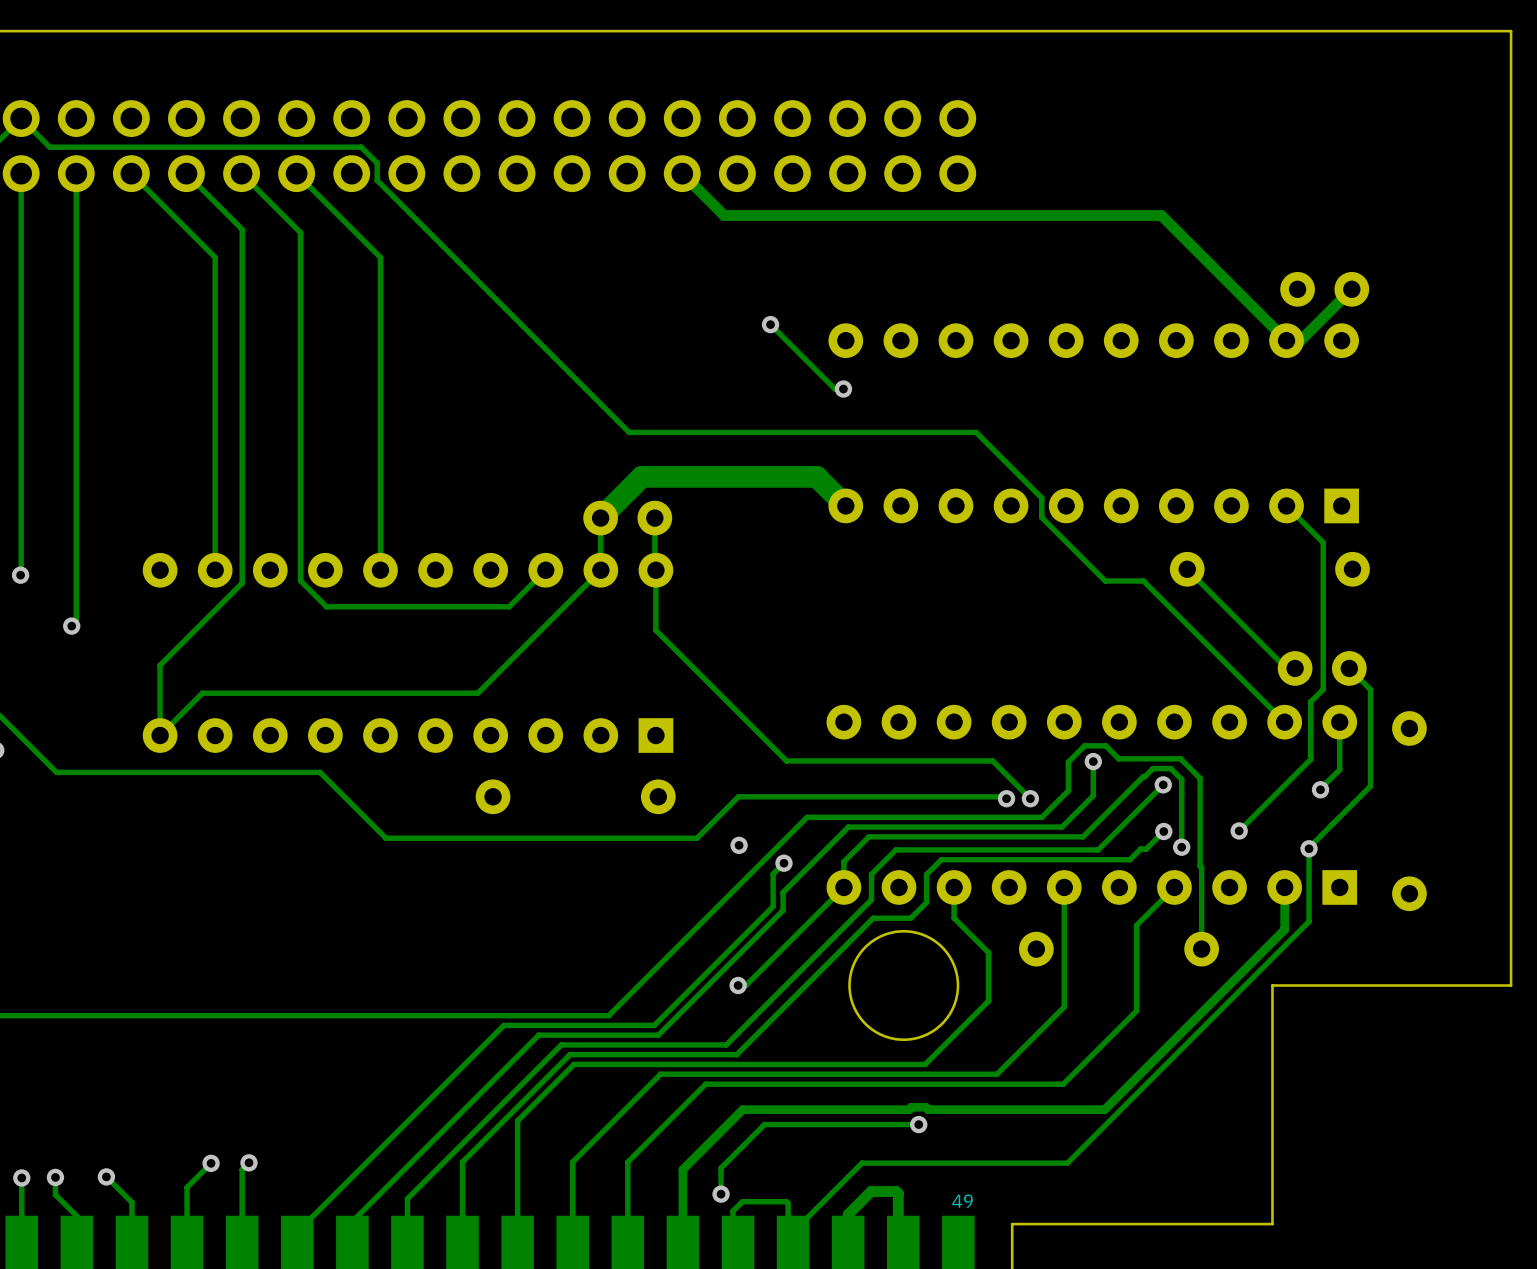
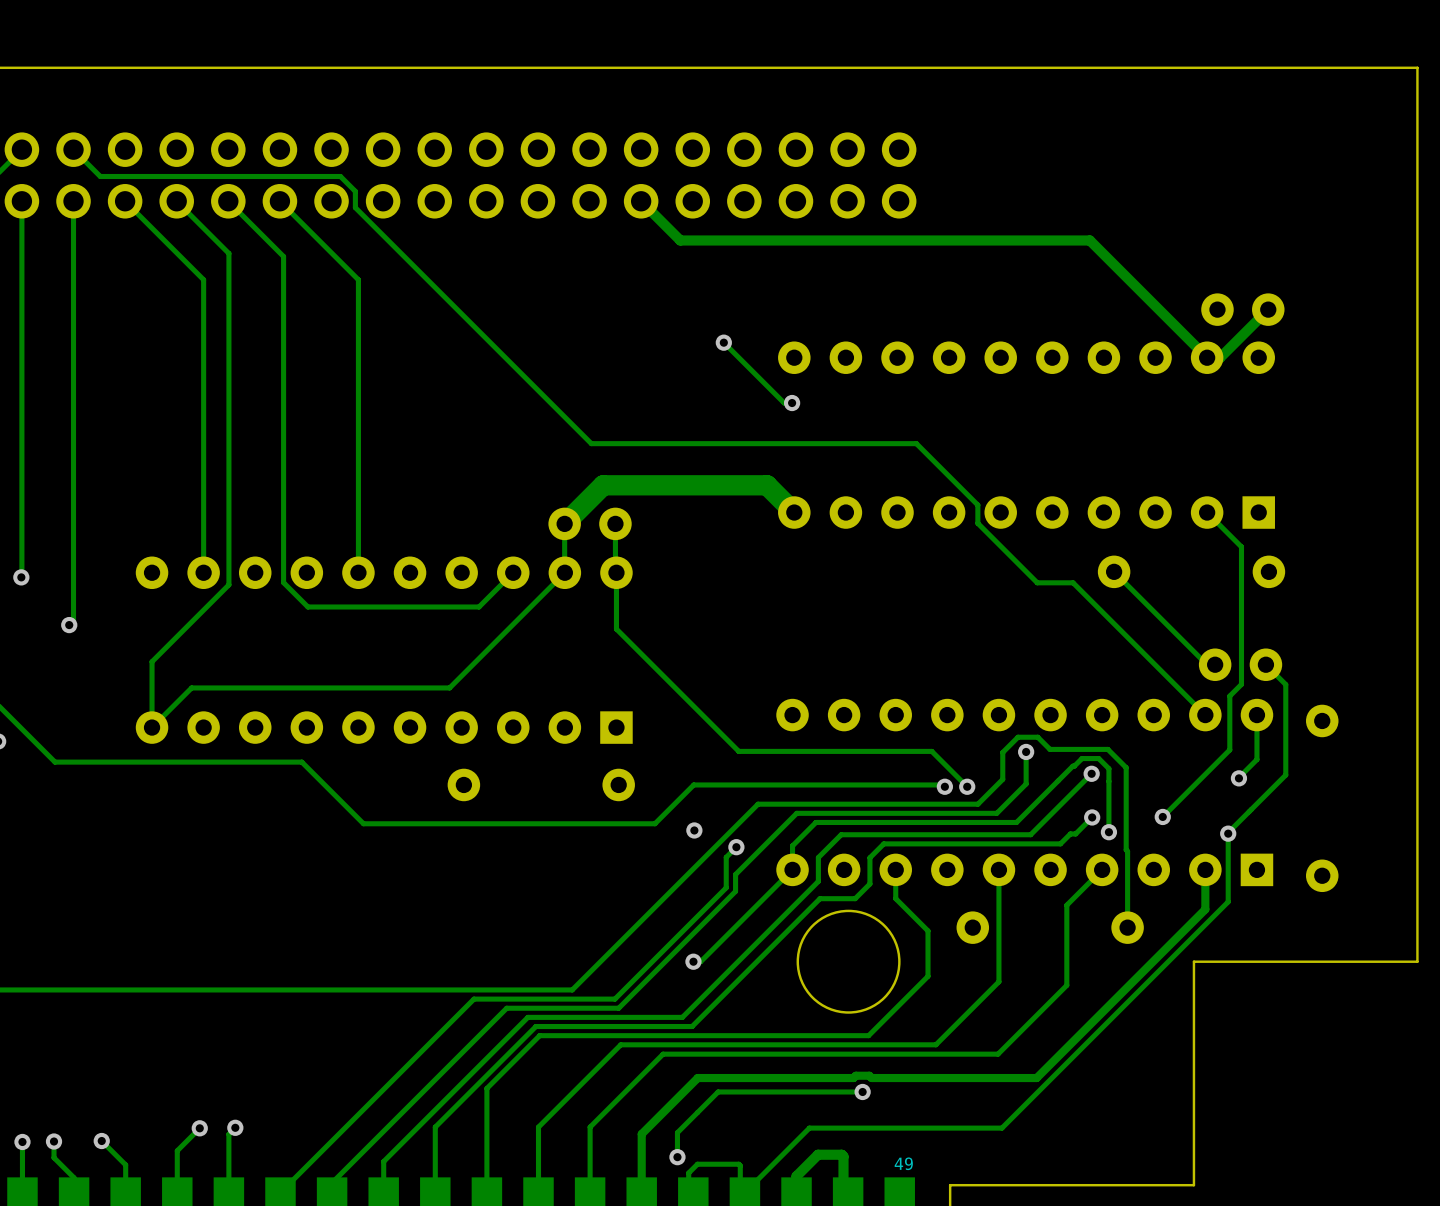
track: (21, 118) (49, 147) (104, 147) -> (73, 149) (100, 176)

